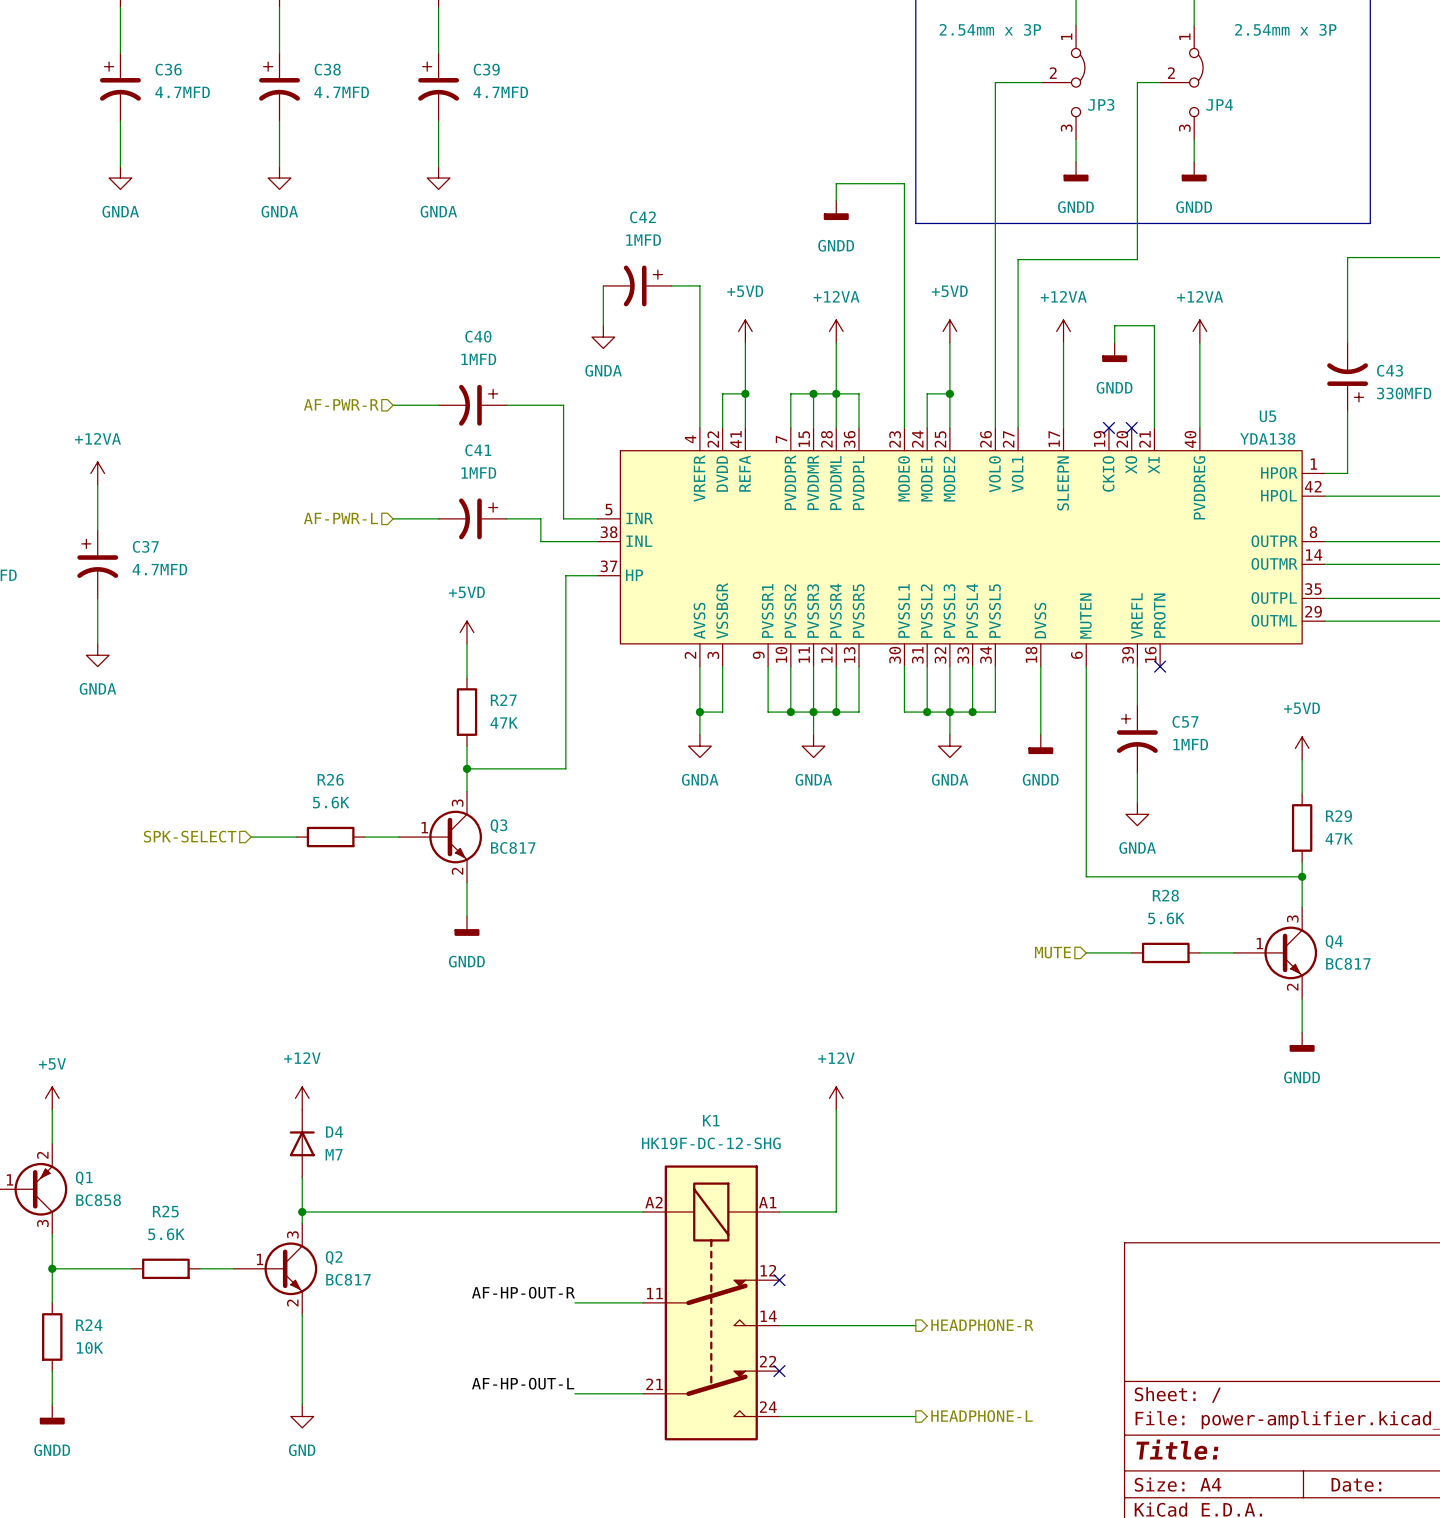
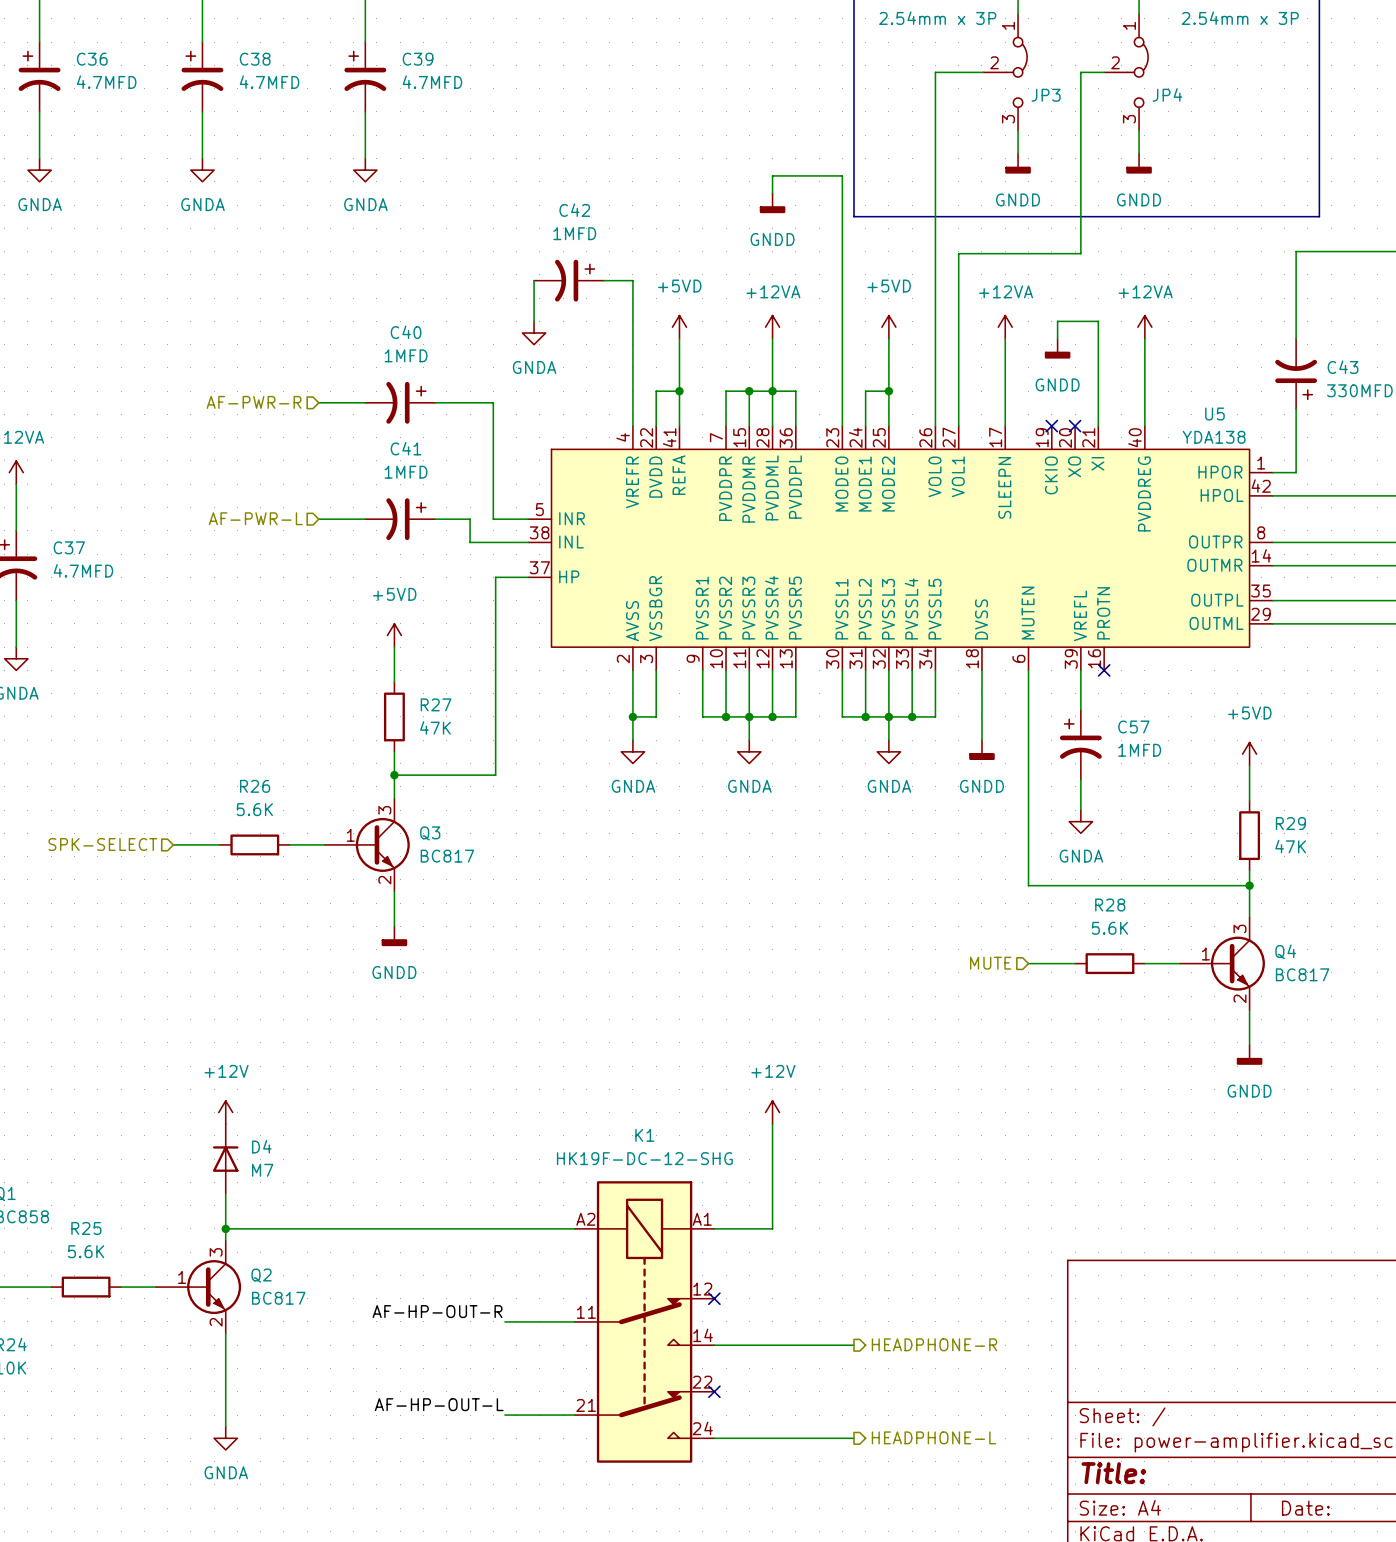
power symbol: GND (302, 1416) -> GNDA (225, 1438)

